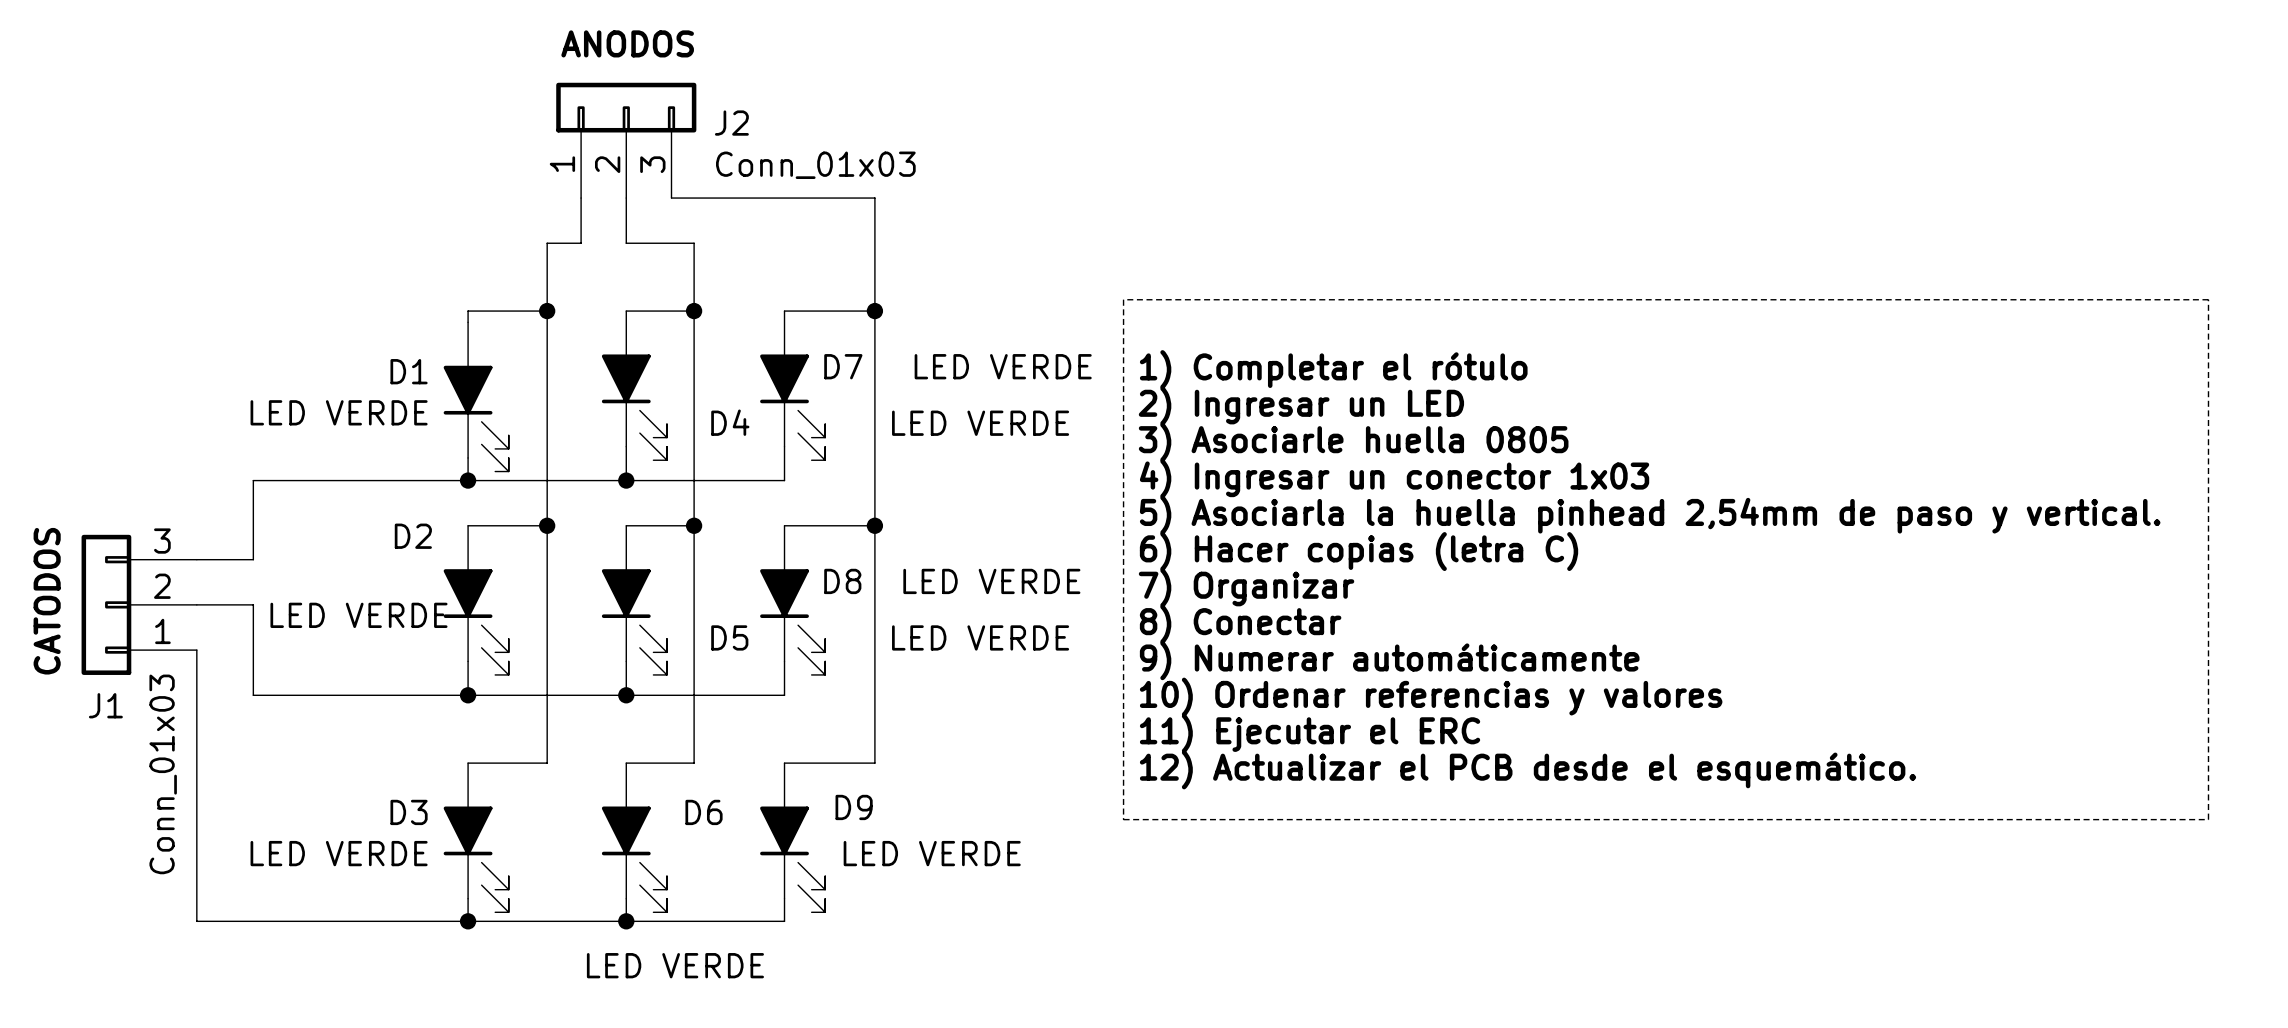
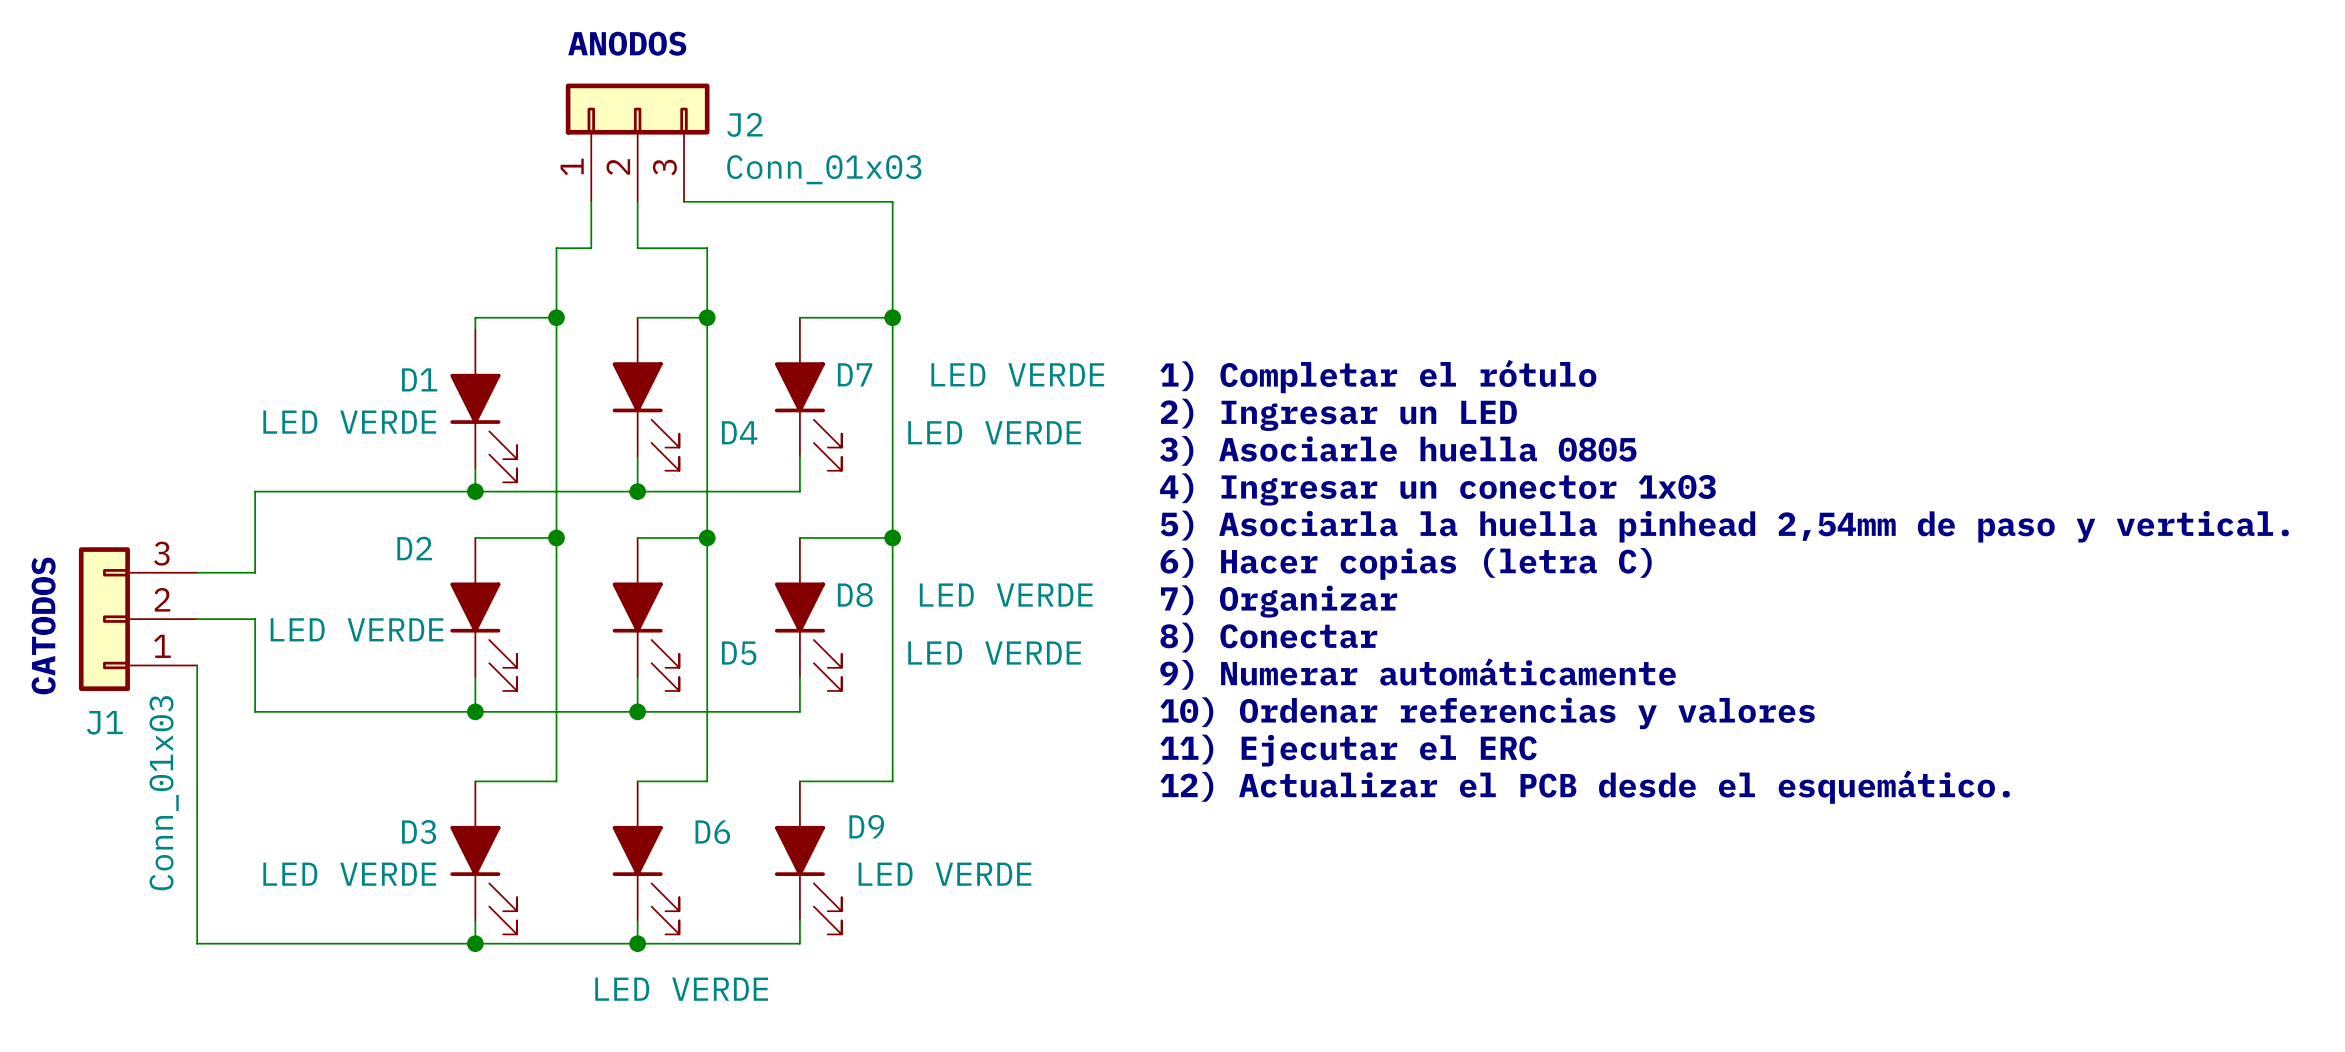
line: (1123, 299) (1123, 819) (2208, 819) (2208, 299) (1123, 299) -> none

